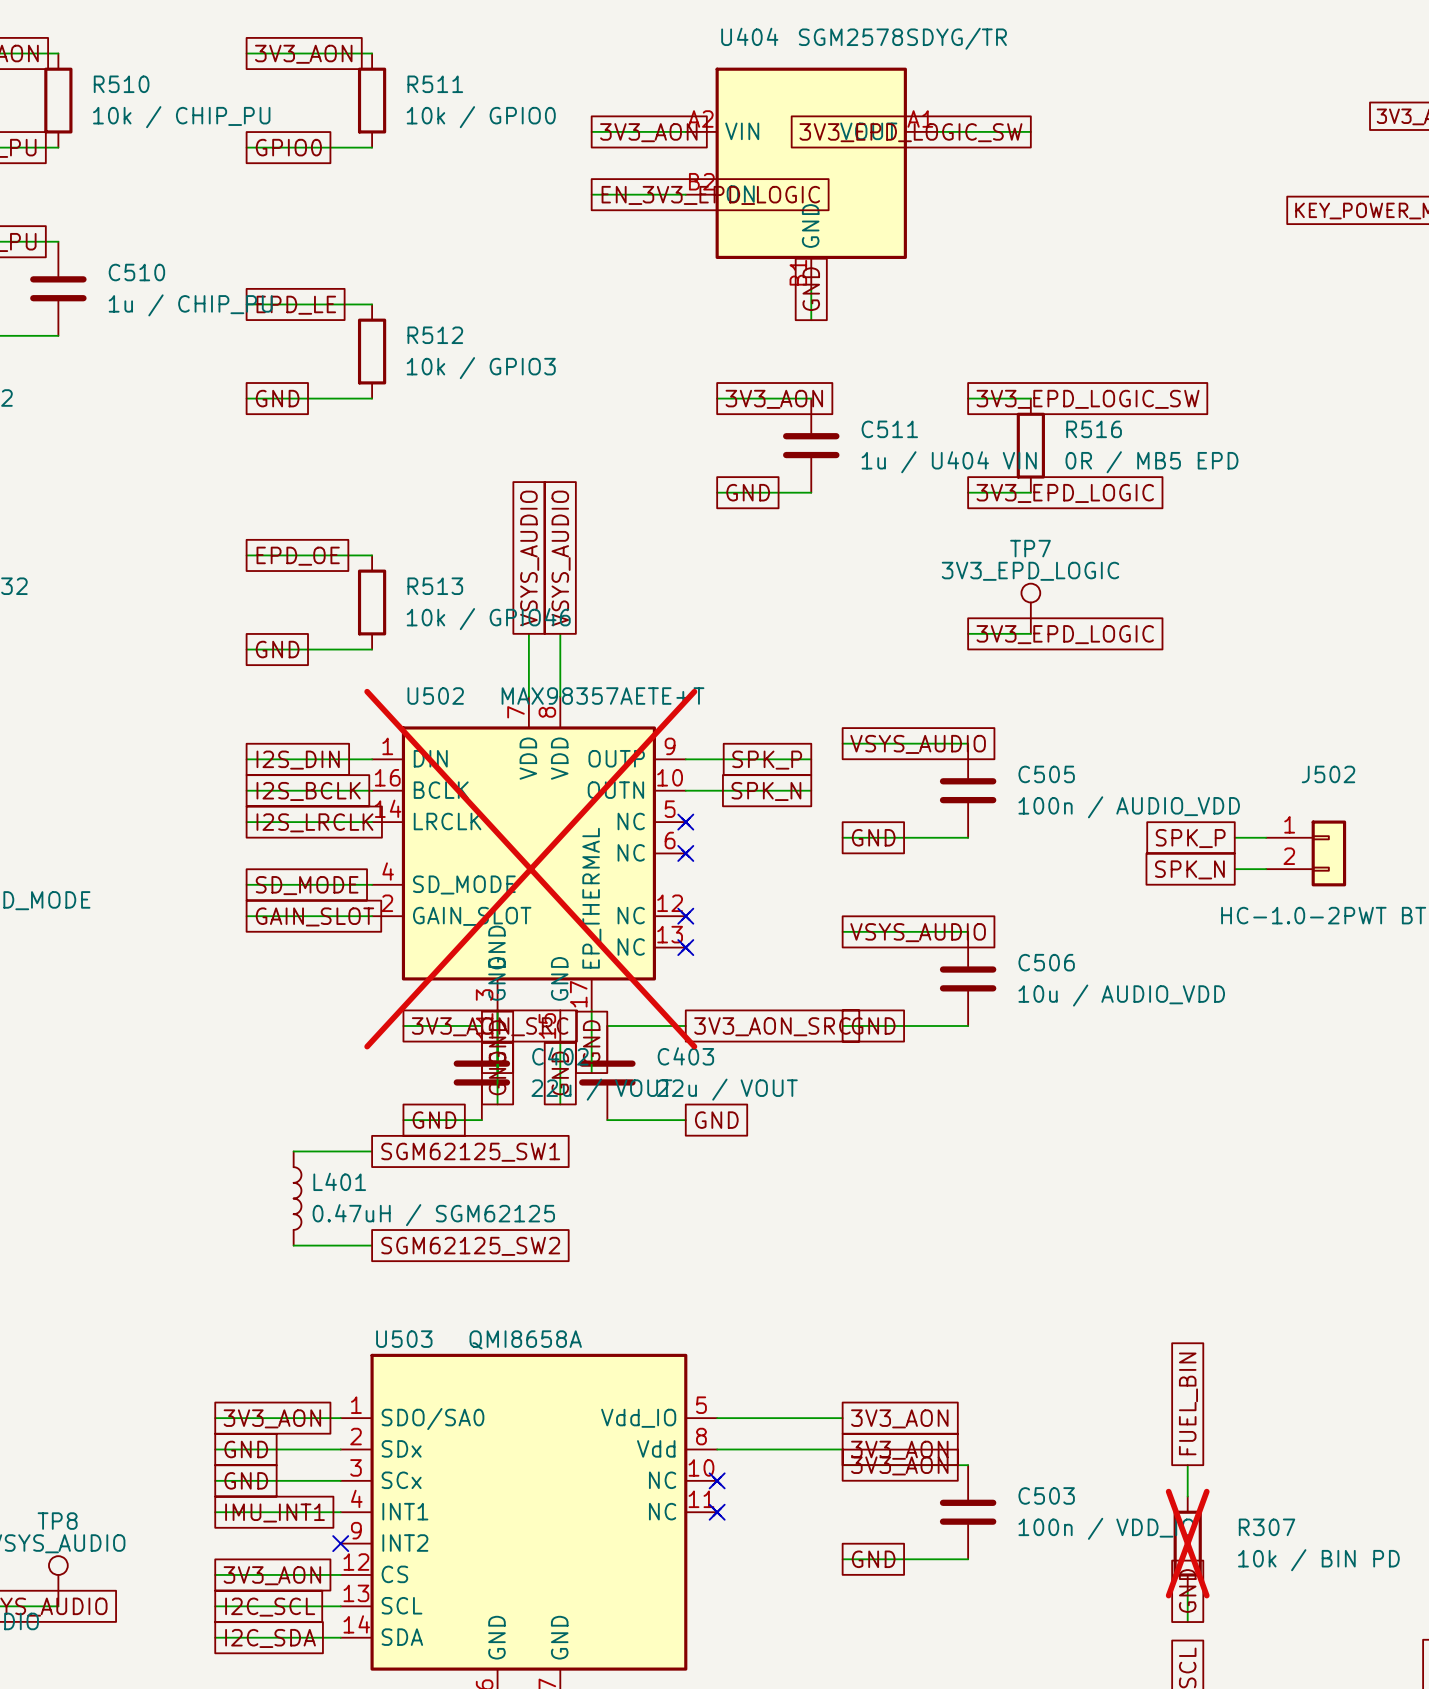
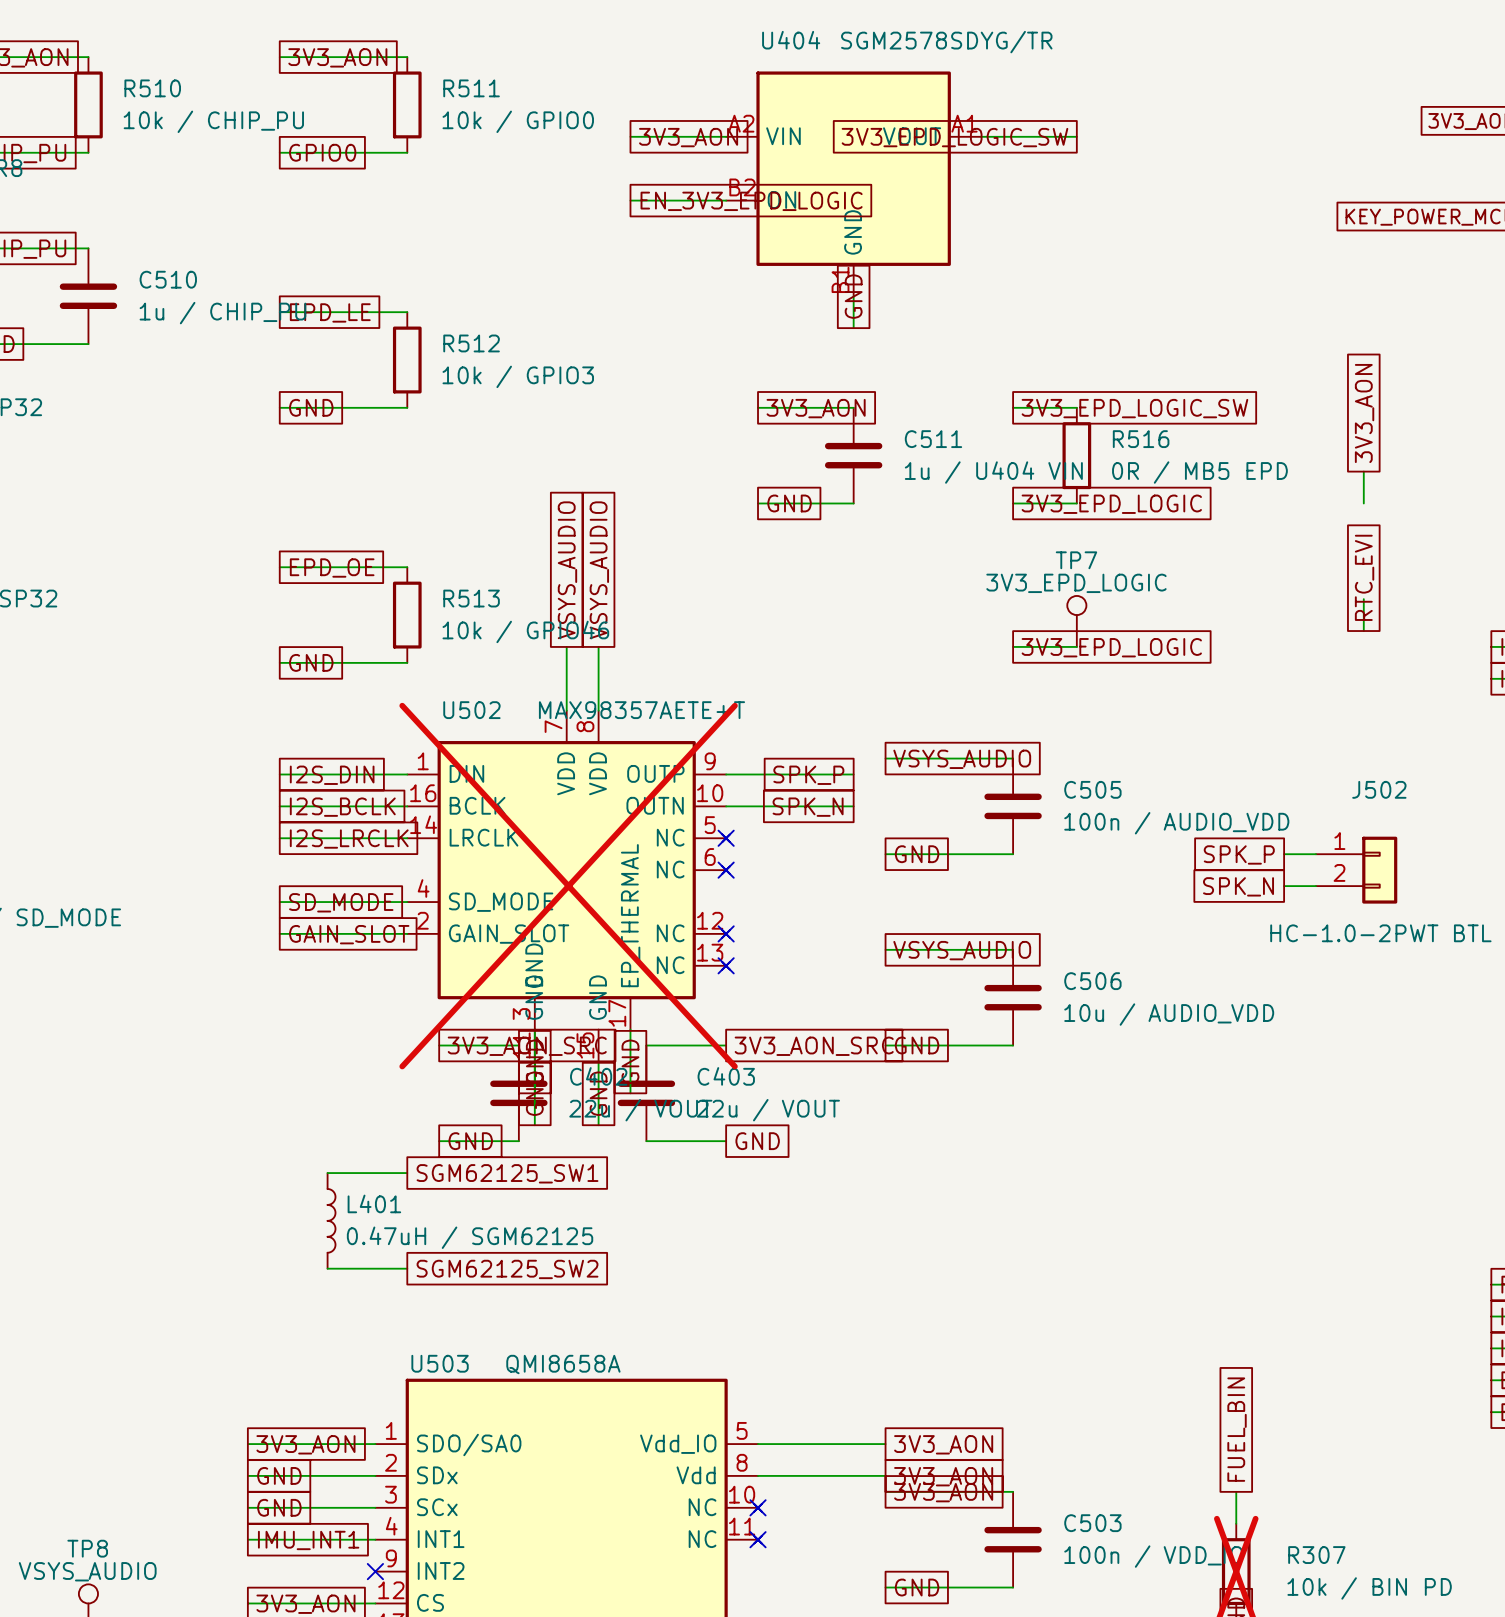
global label: none -> 3V3_AON (1364, 413)
wire: none -> (1363, 471) (1363, 503)
global label: none -> RTC_EVI (1364, 577)
wire: none -> (1363, 599) (1363, 631)

